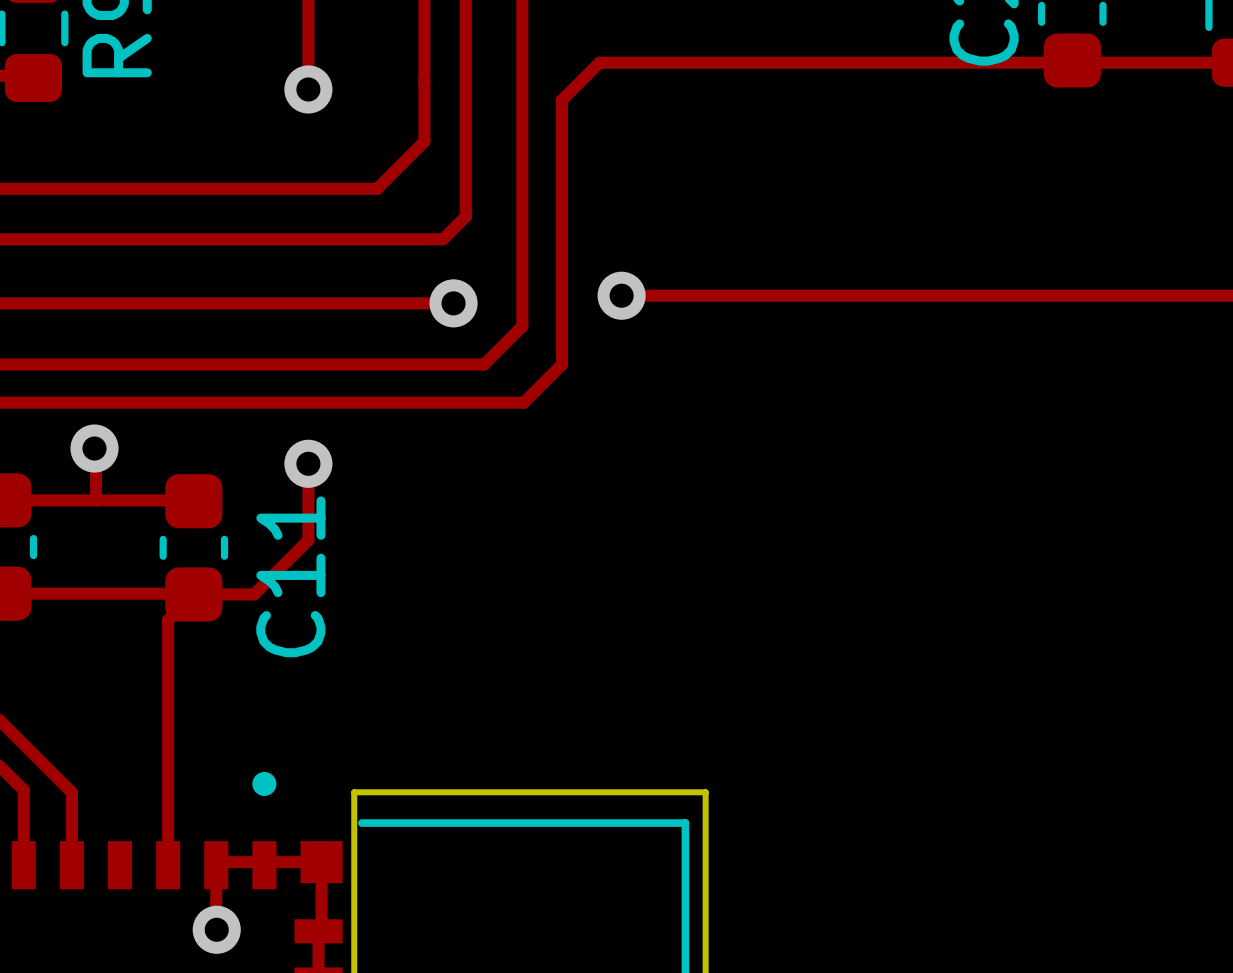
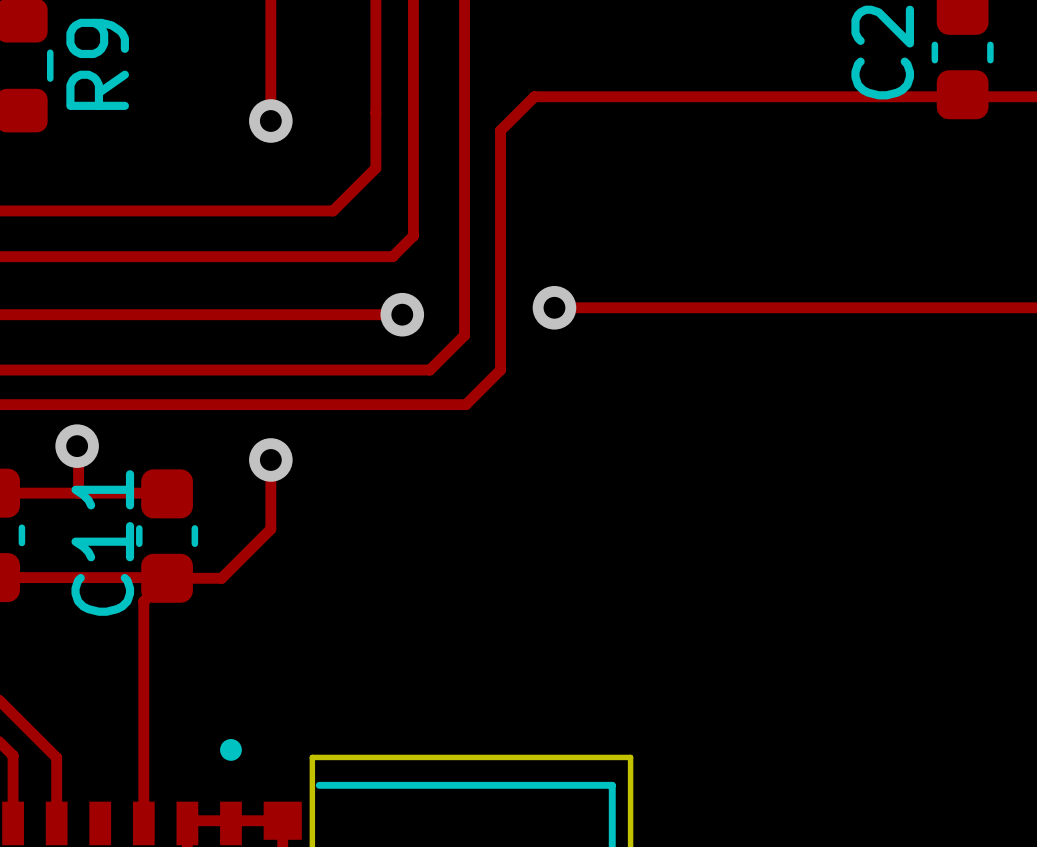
C11 name position: C11 (290, 576) -> C11 (102, 542)

